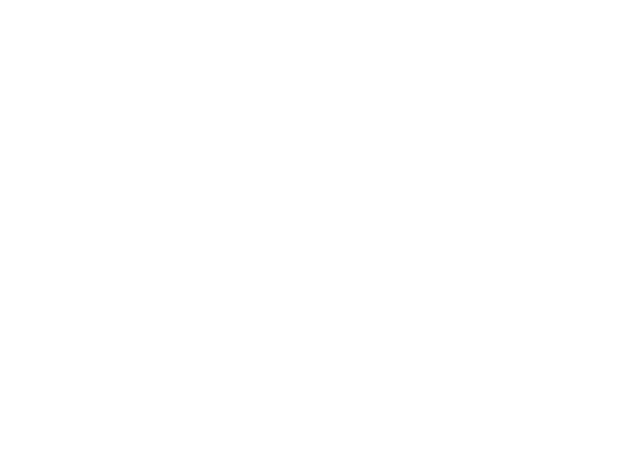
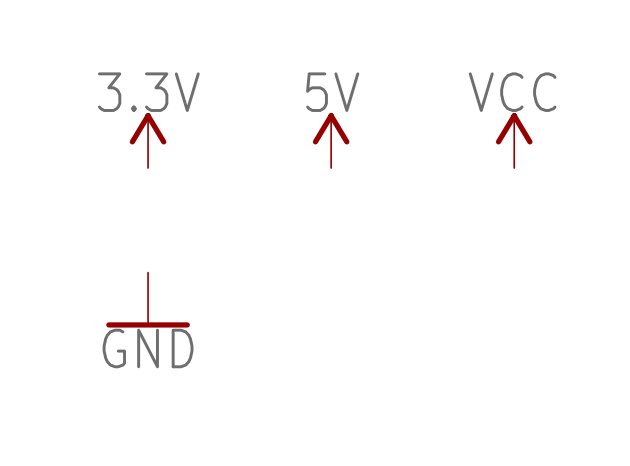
power symbol: none -> 3.3V (148, 140)
power symbol: none -> 5V (331, 140)
power symbol: none -> VCC (514, 140)
power symbol: none -> GND (148, 300)

